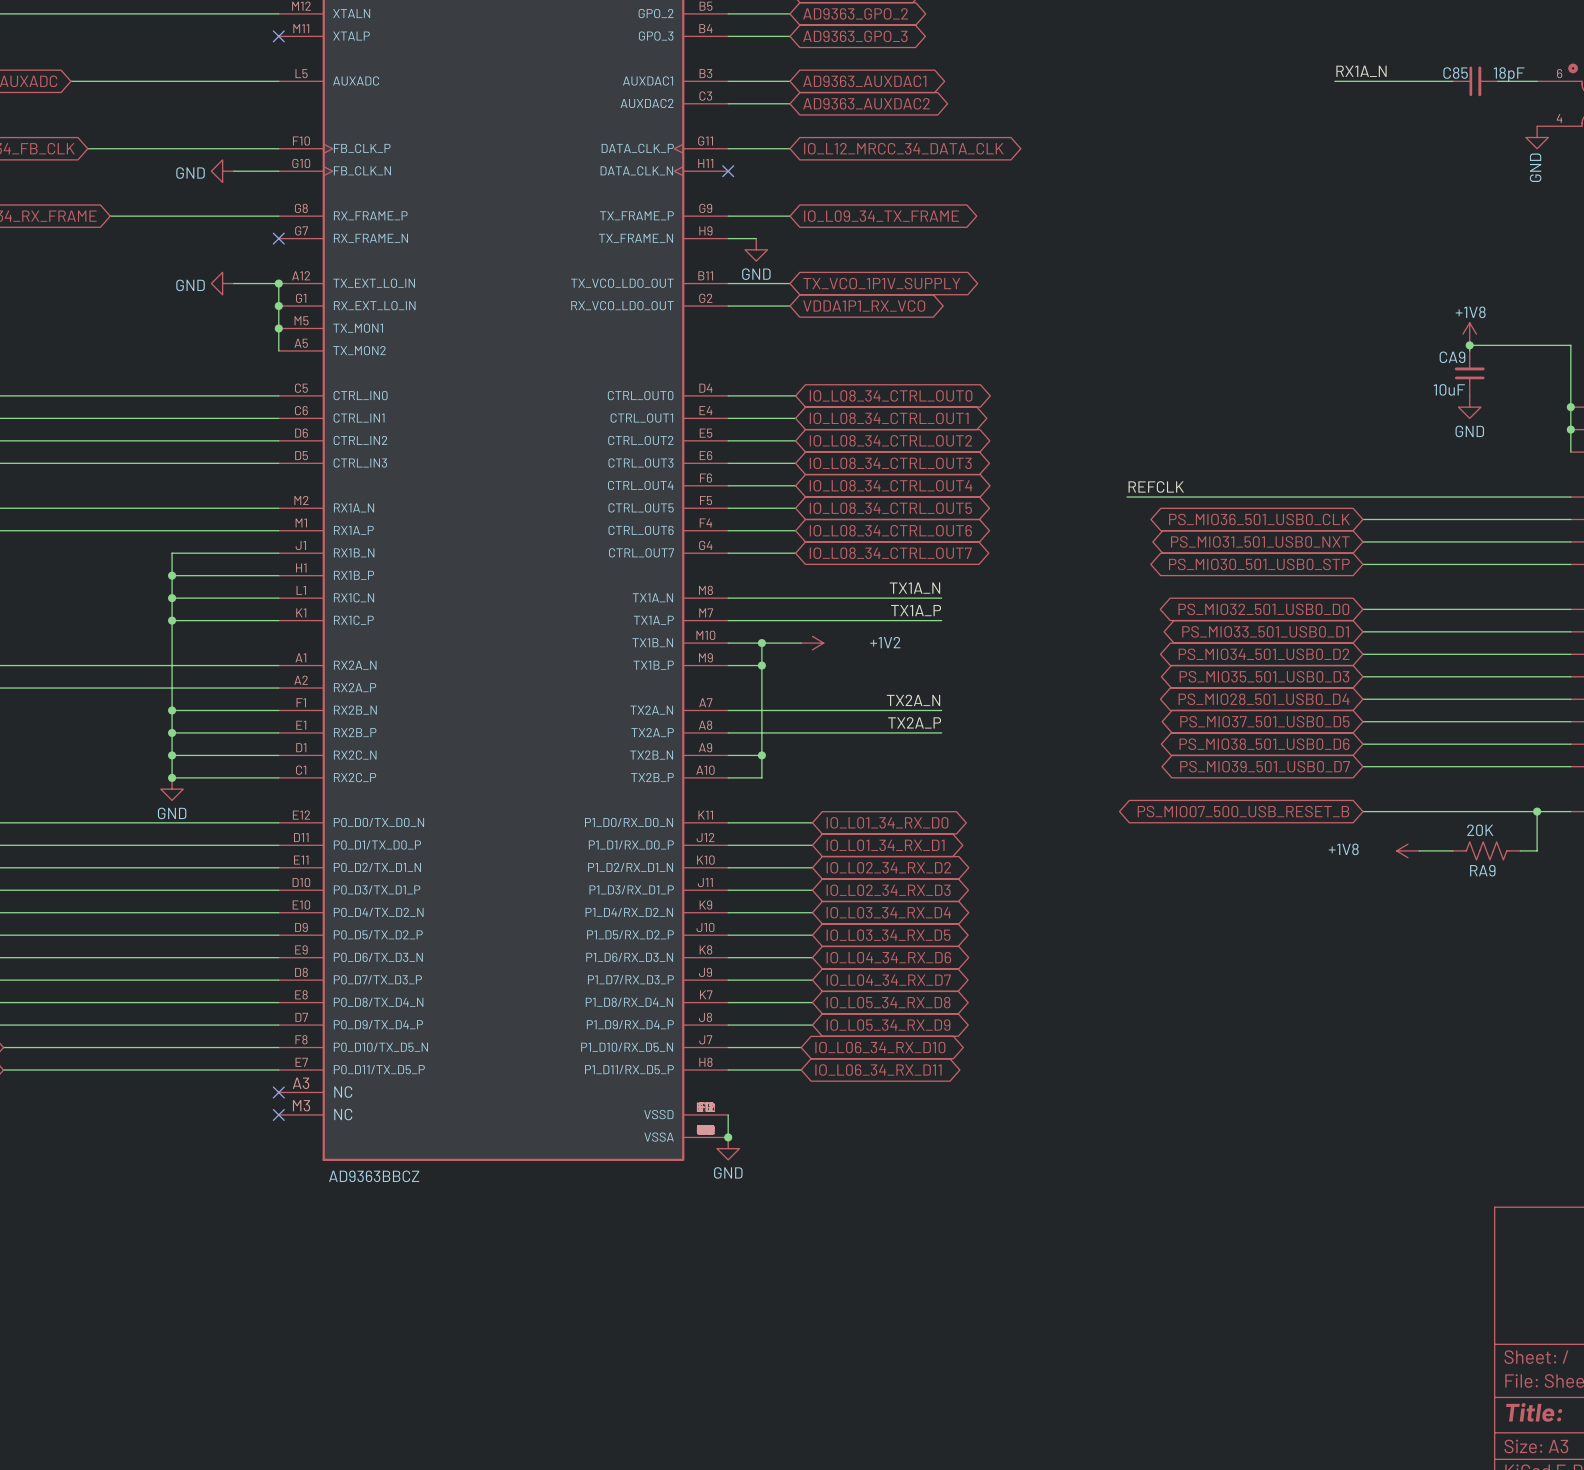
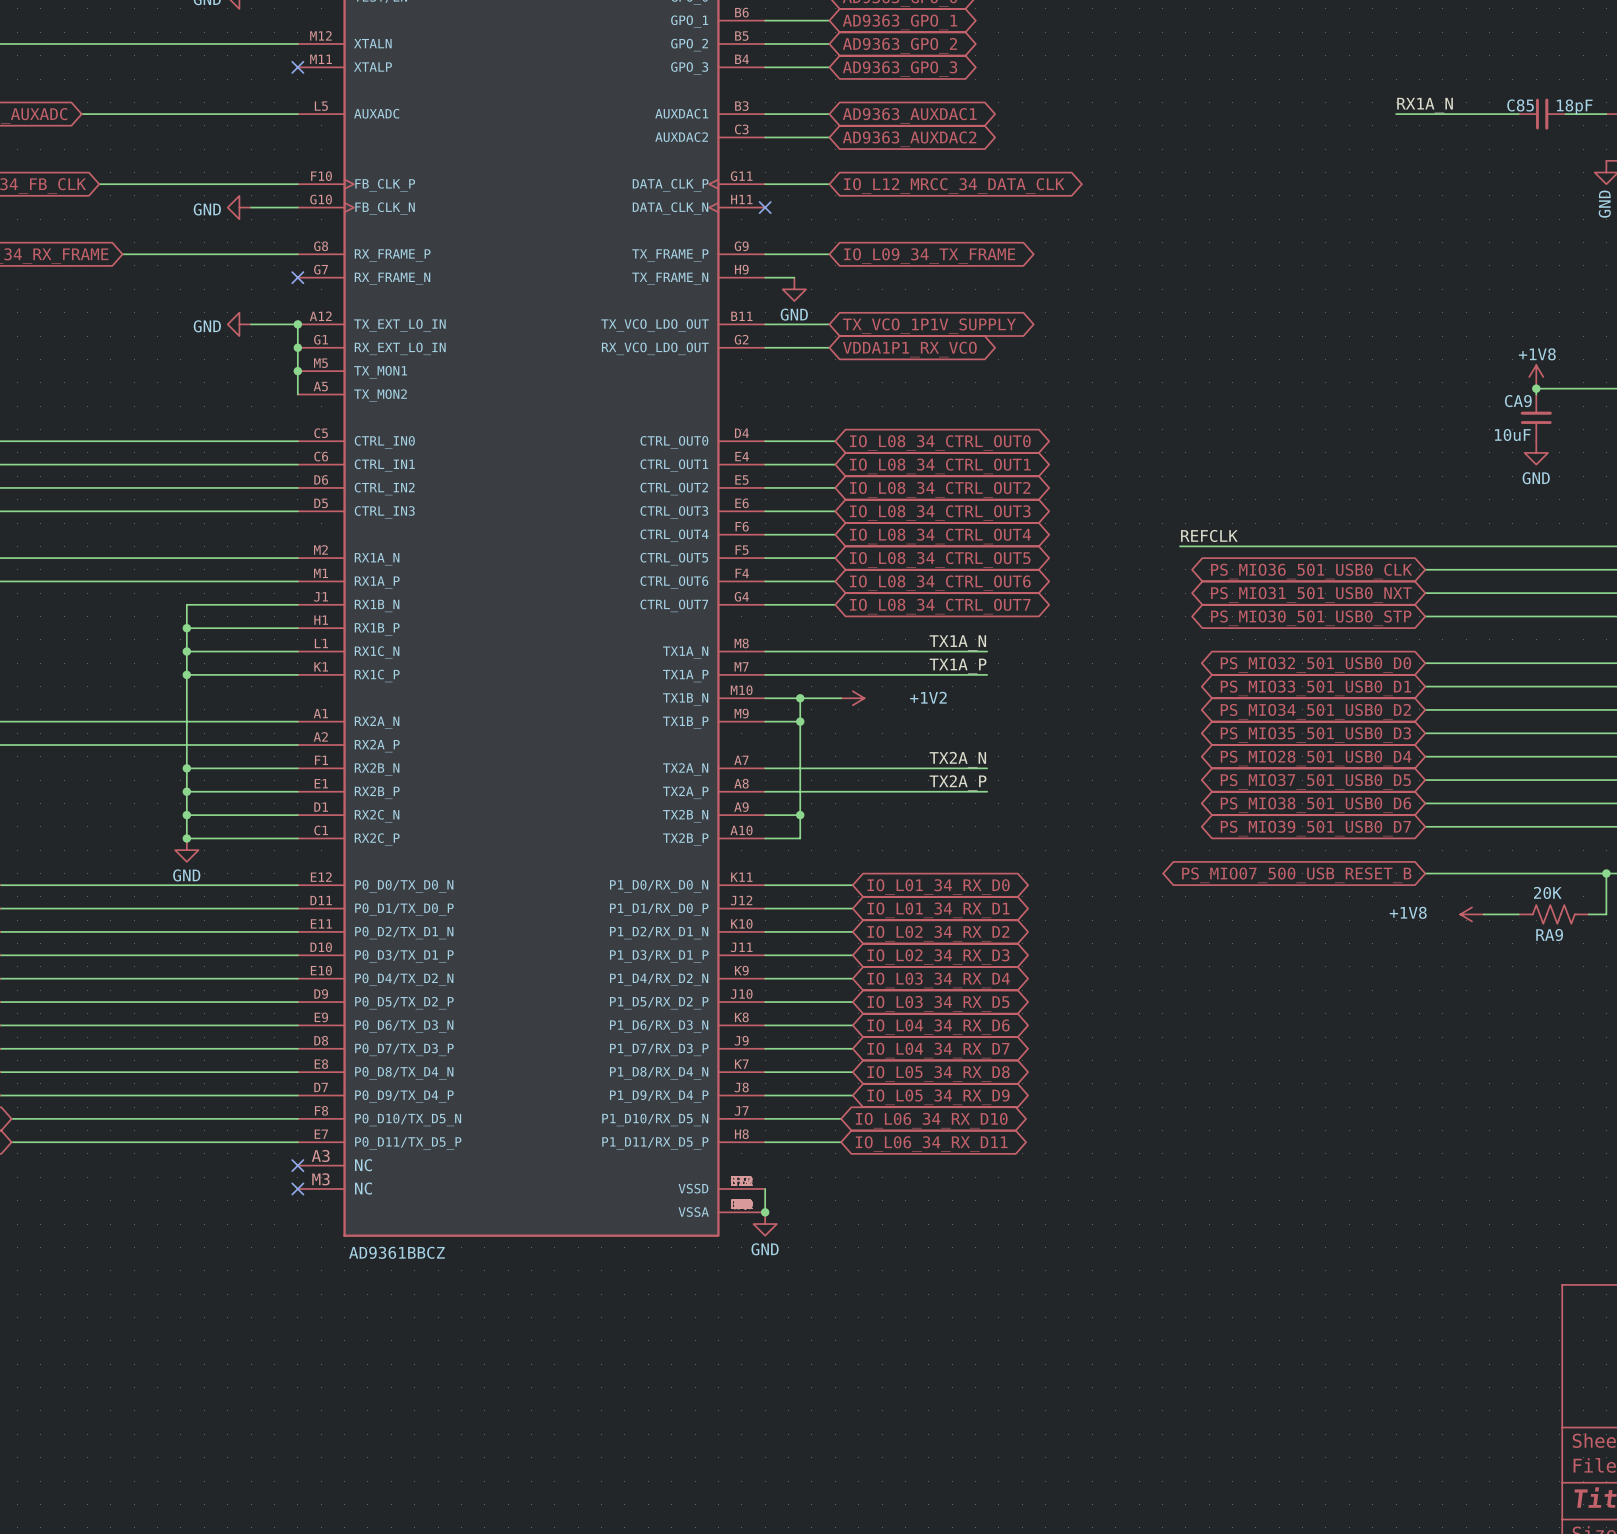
part value: AD9363BBCZ (374, 1176) -> AD9361BBCZ (397, 1252)

